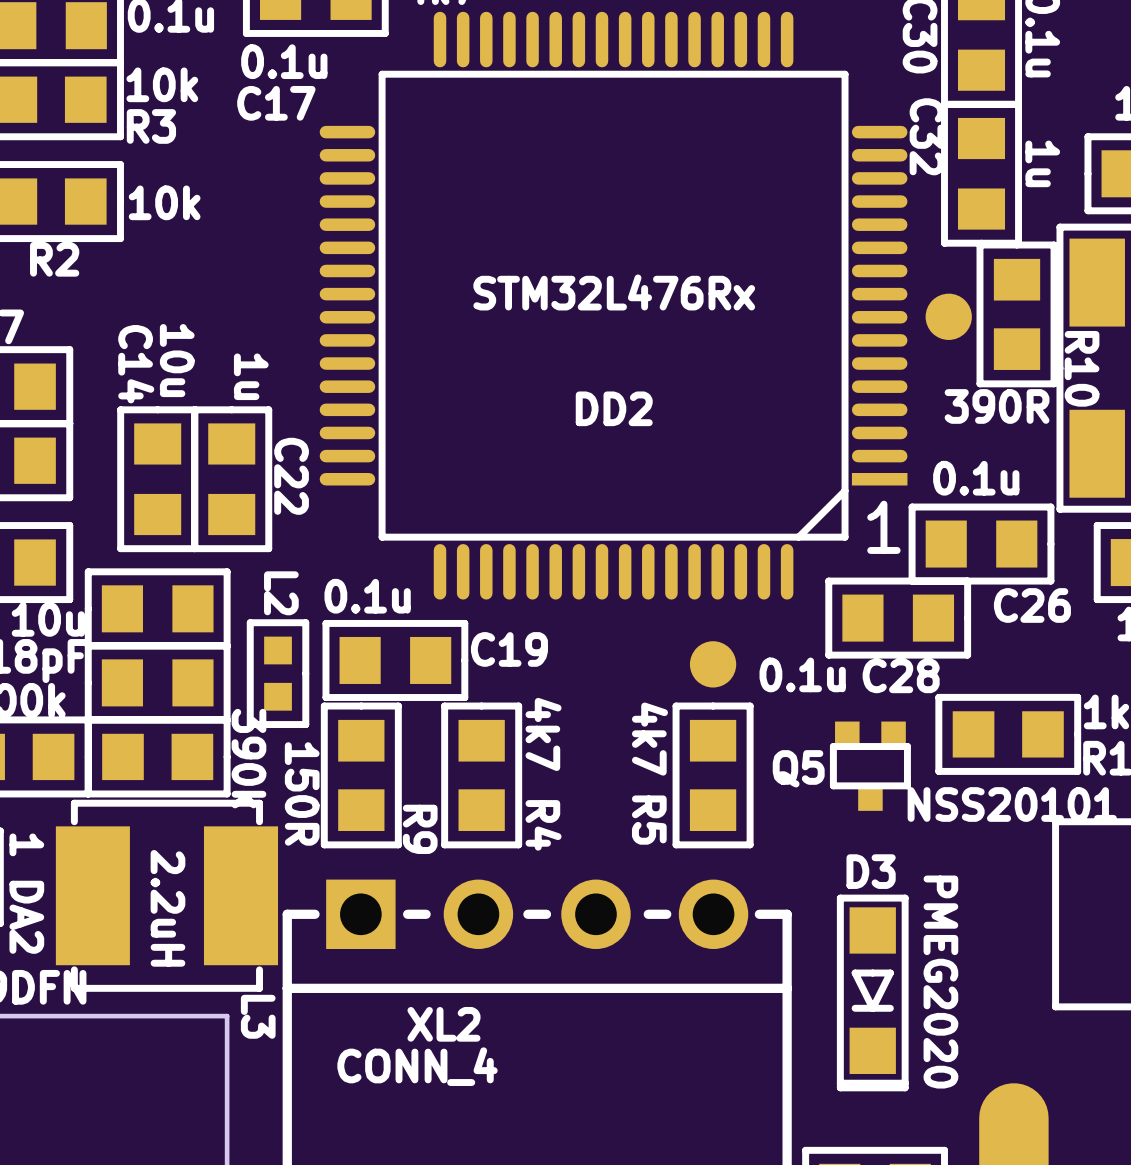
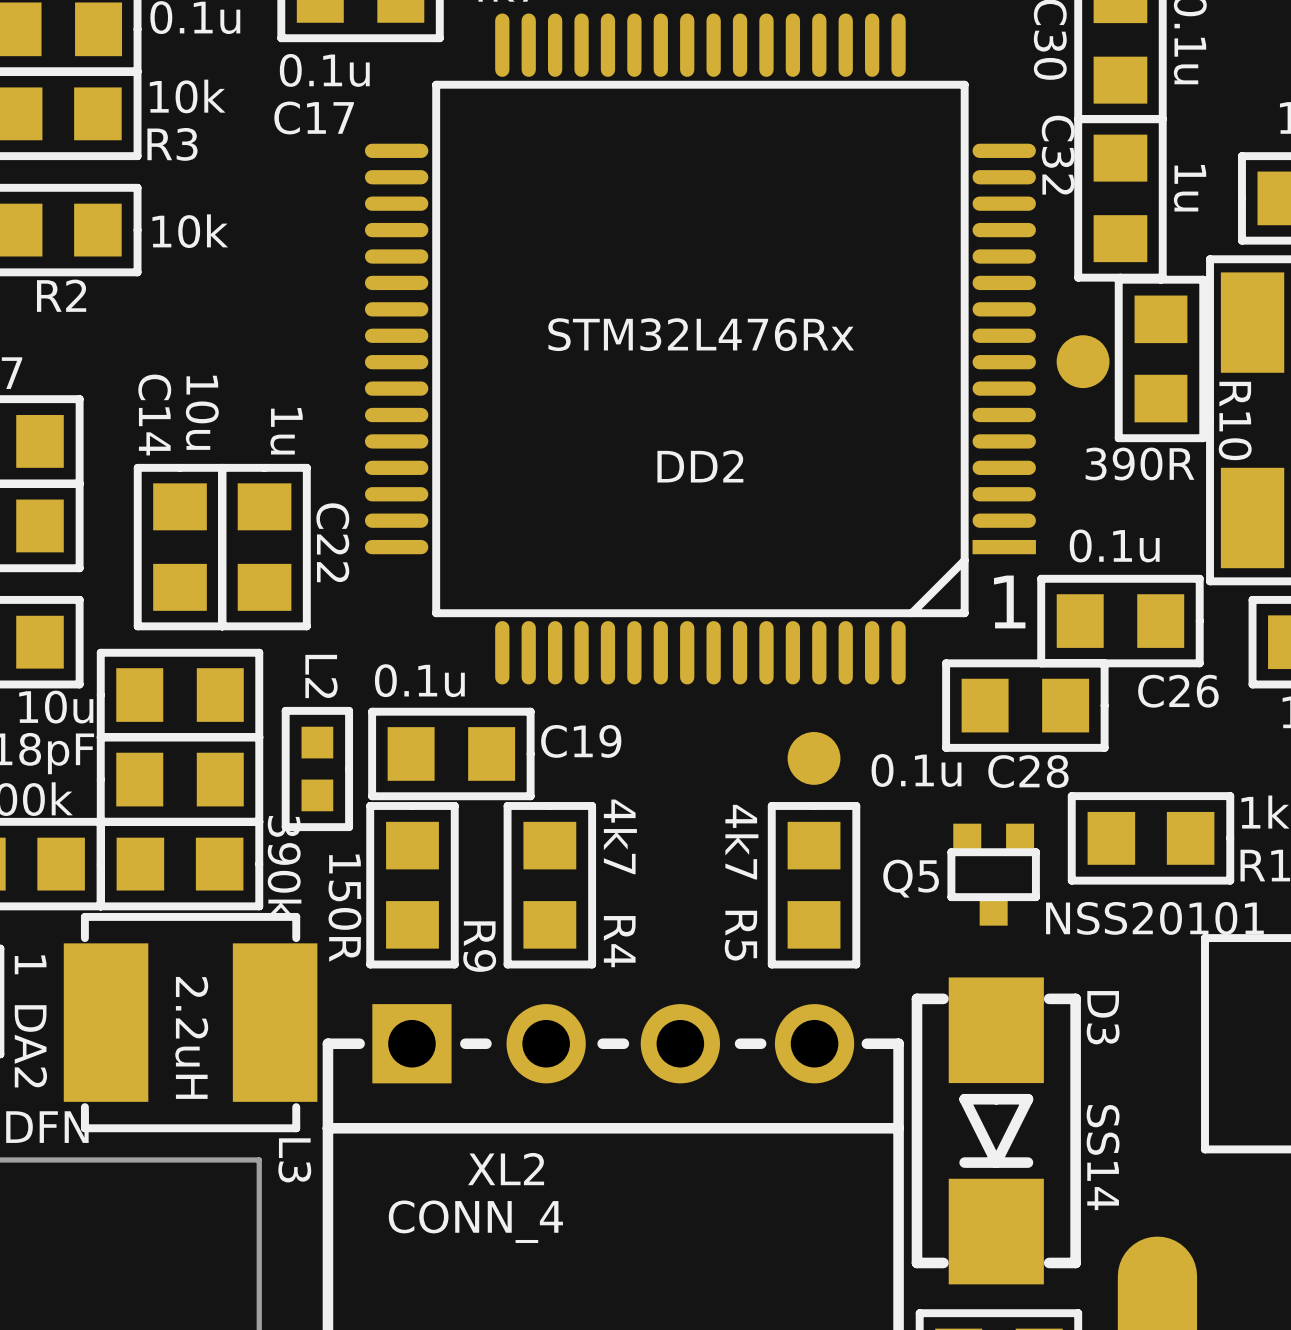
D3 name position: D3 (871, 871) -> D3 (1103, 1017)
D3 footprint: [836, 894, 909, 1092] -> [911, 977, 1081, 1285]
D3 value: PMEG2020 (940, 982) -> SS14 (1103, 1157)

